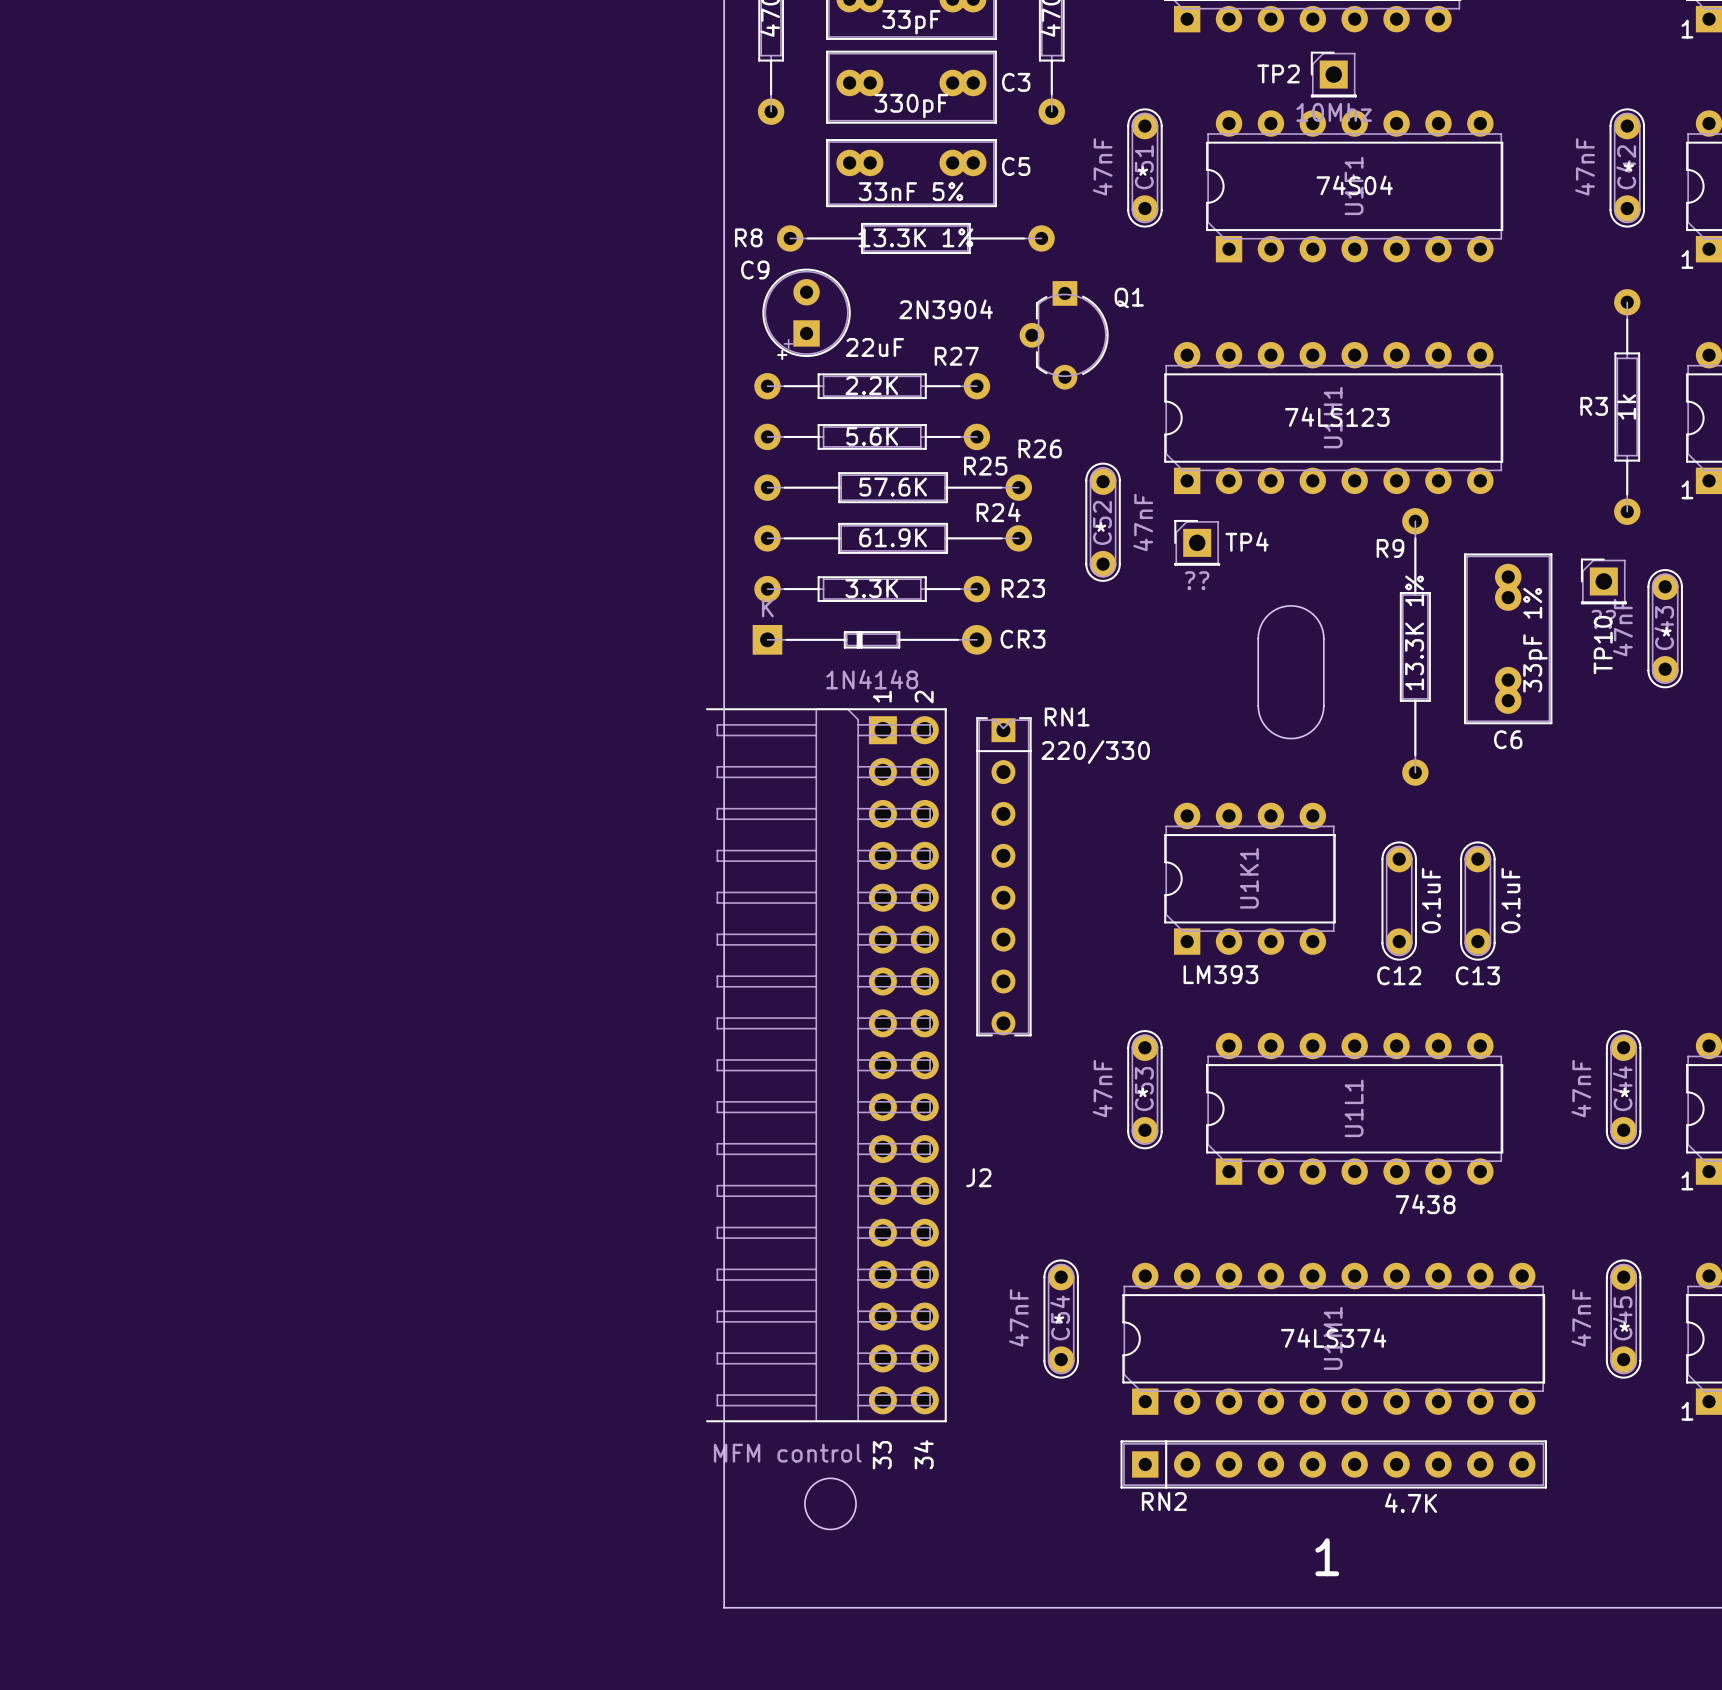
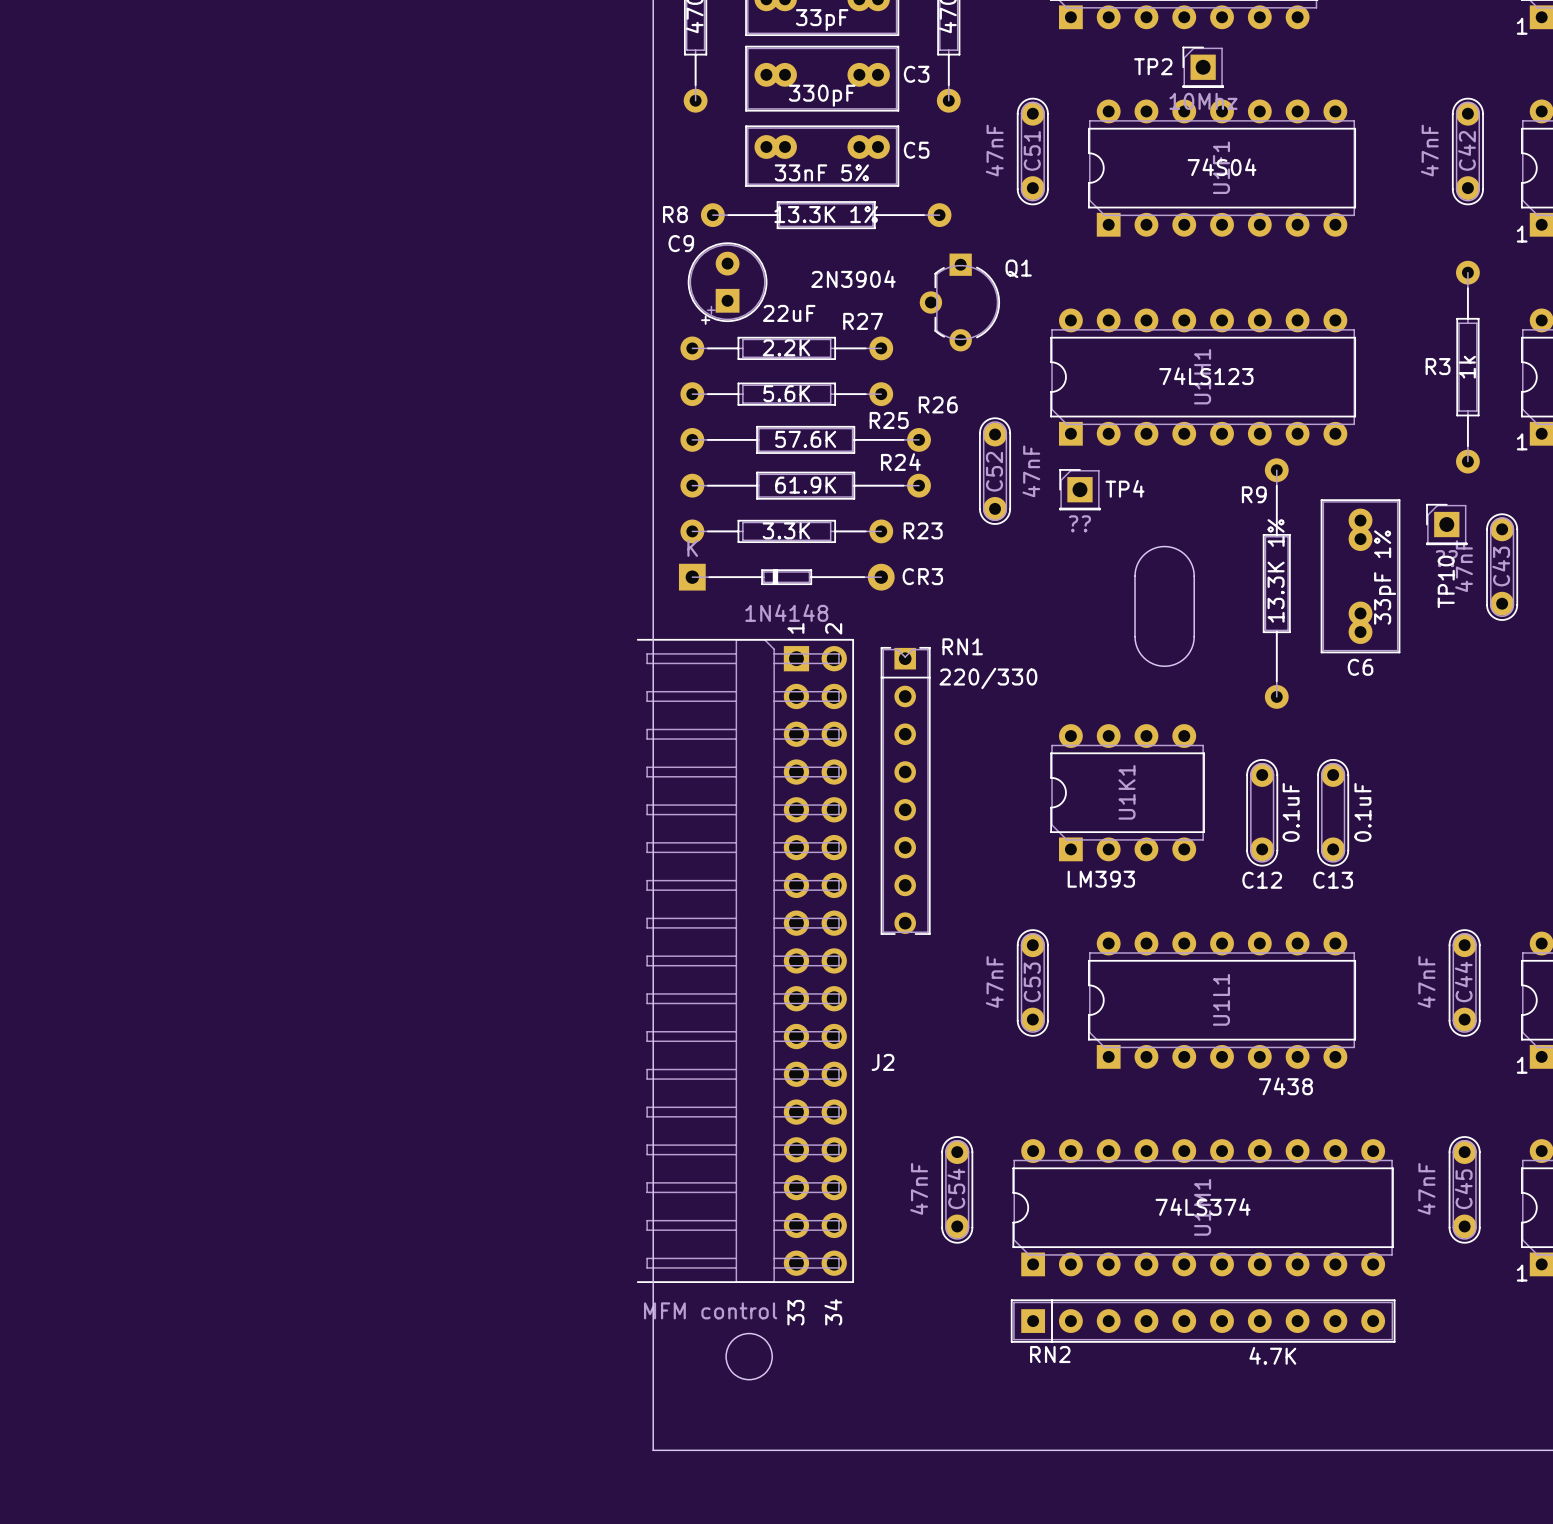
text: * (1628, 166) -> none
text: * (1142, 171) -> none
text: * (1101, 527) -> none
text: * (1666, 631) -> none
text: * (1142, 1092) -> none
text: * (1624, 1092) -> none
text: * (1059, 1318) -> none
text: * (1624, 1327) -> none
text: 1 (1327, 1557) -> none

